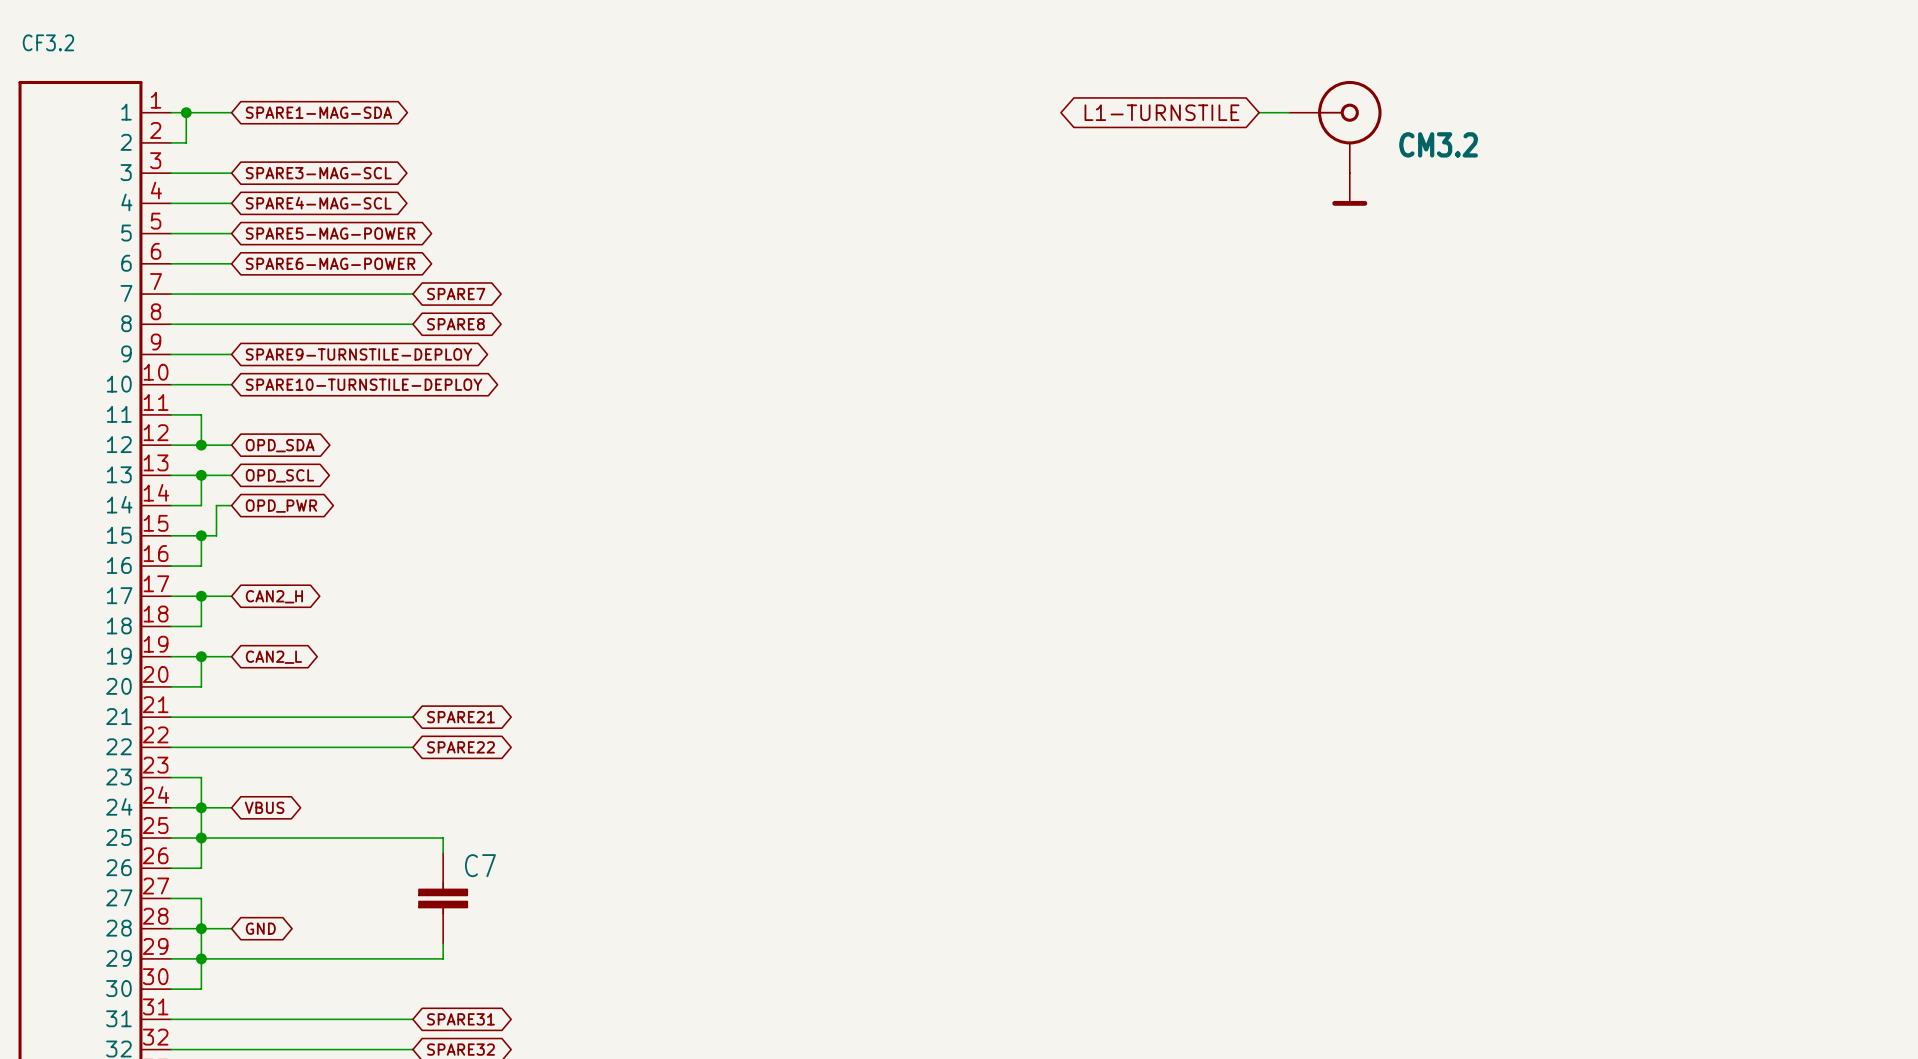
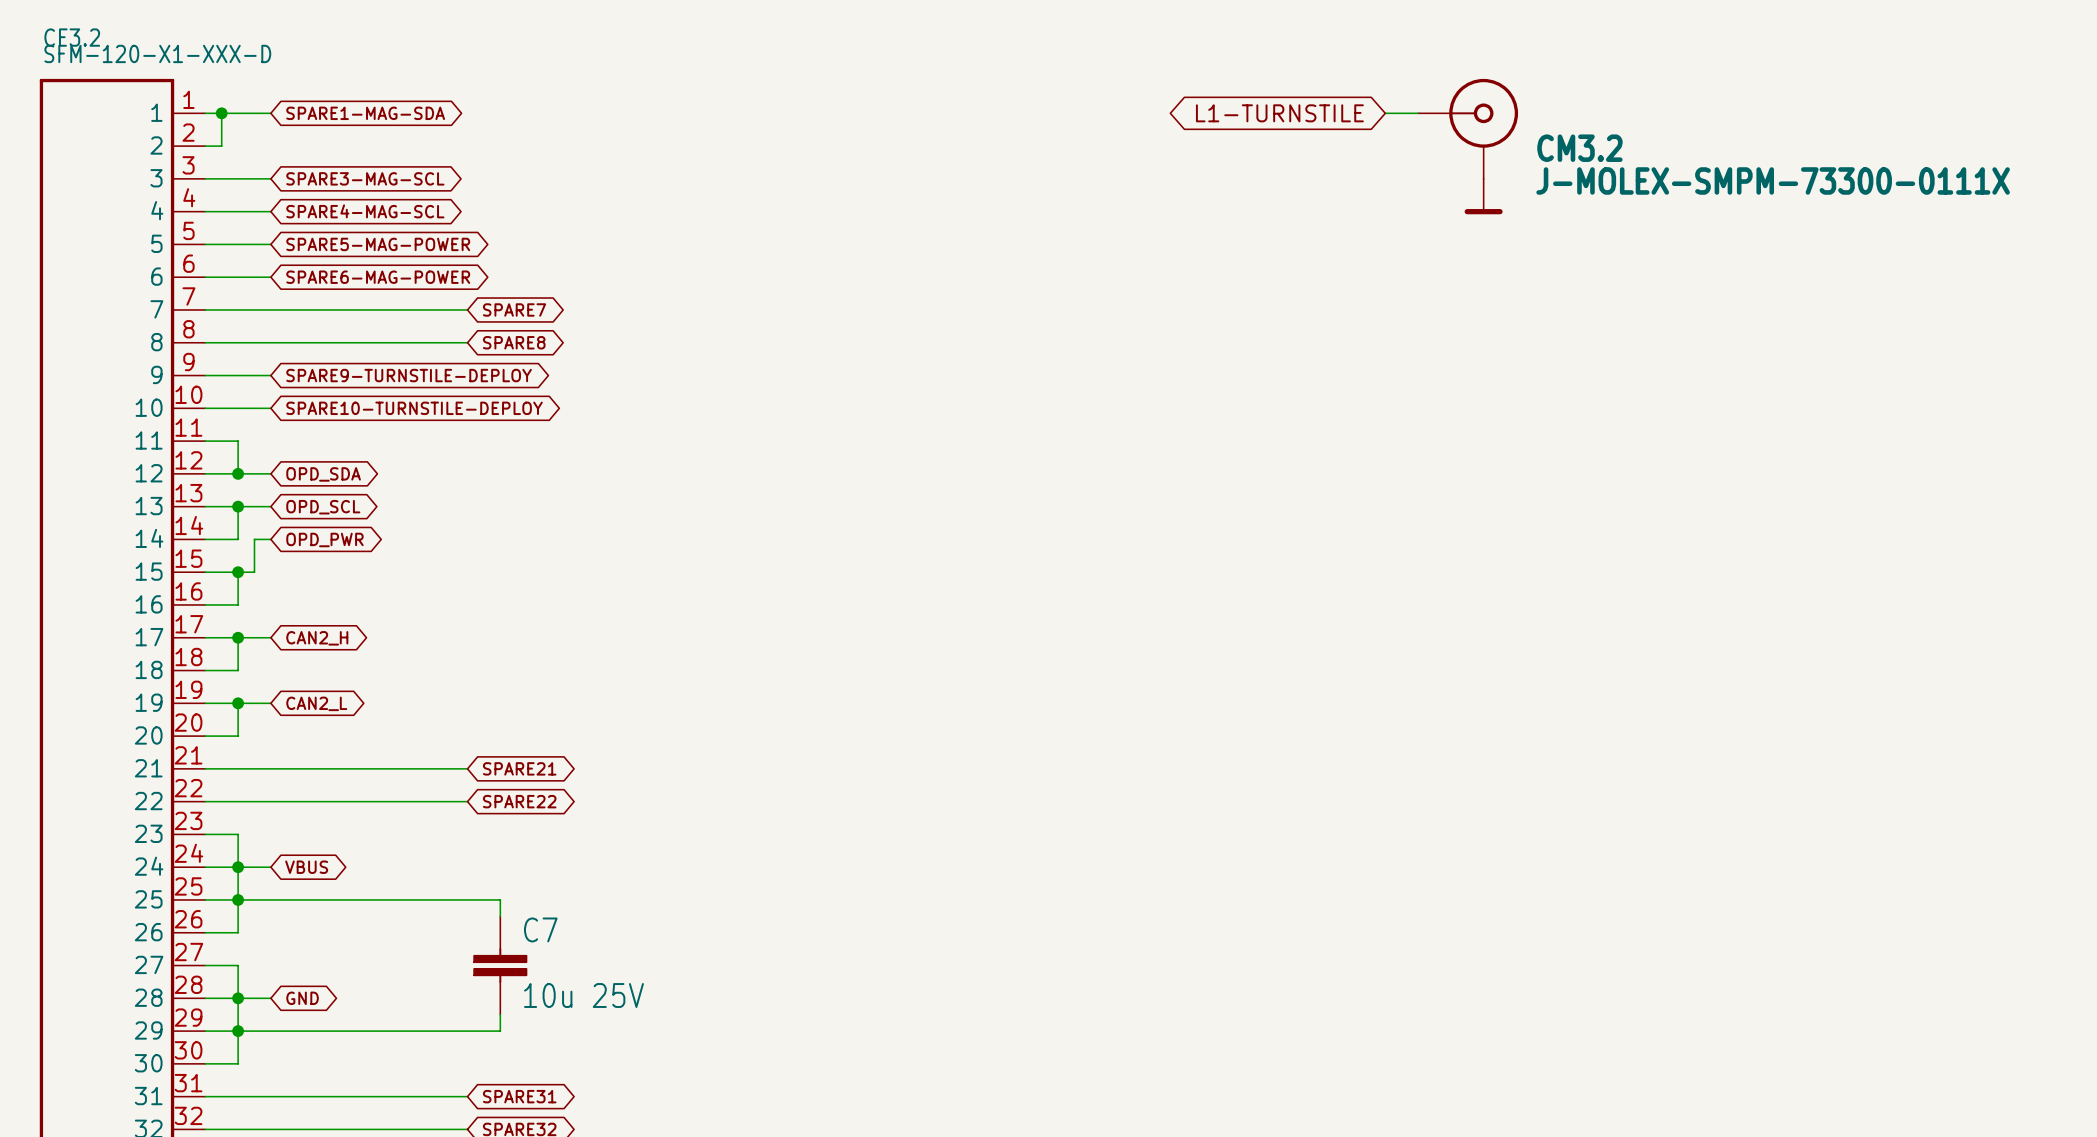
CF3.2 value: none -> SFM-120-X1-XXX-D (157, 53)
CM3.2 value: none -> J-MOLEX-SMPM-73300-0111X (1773, 180)
C7 value: none -> 10u 25V (583, 995)

